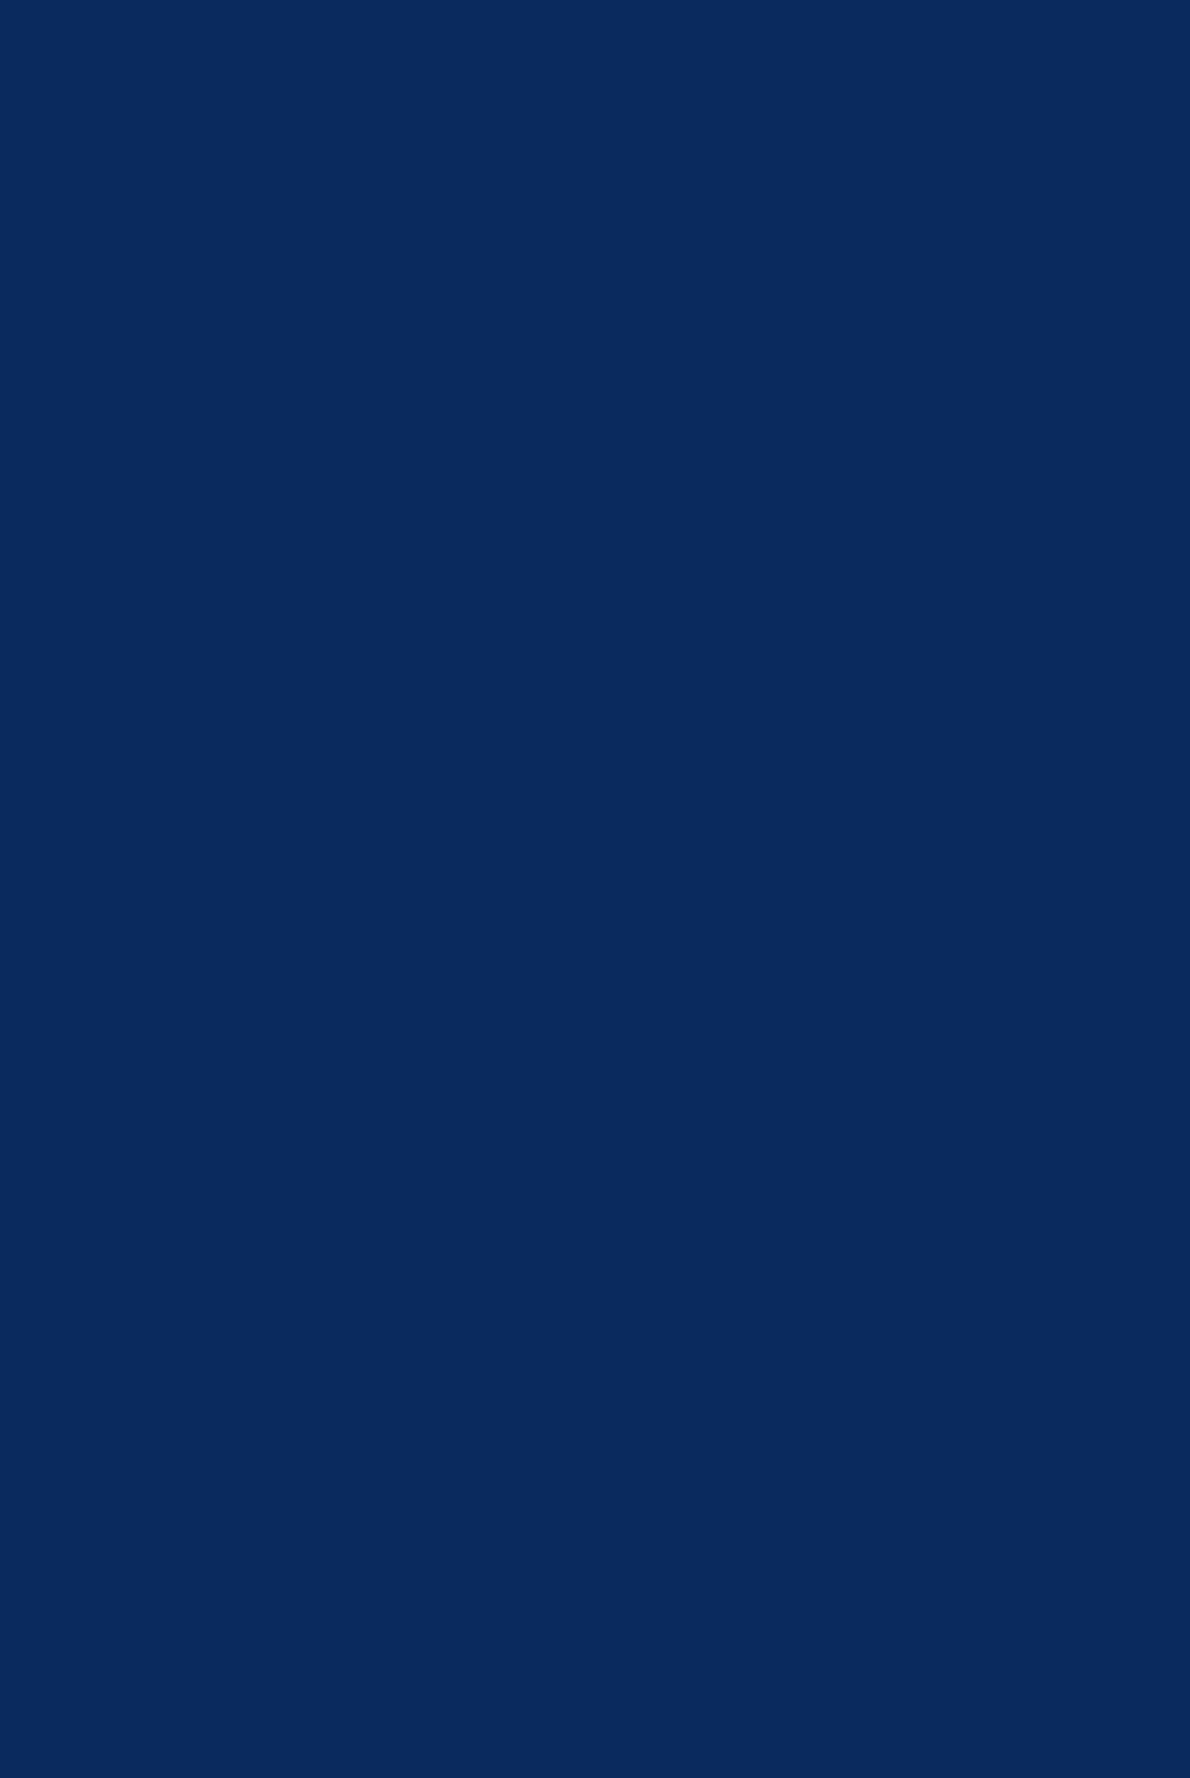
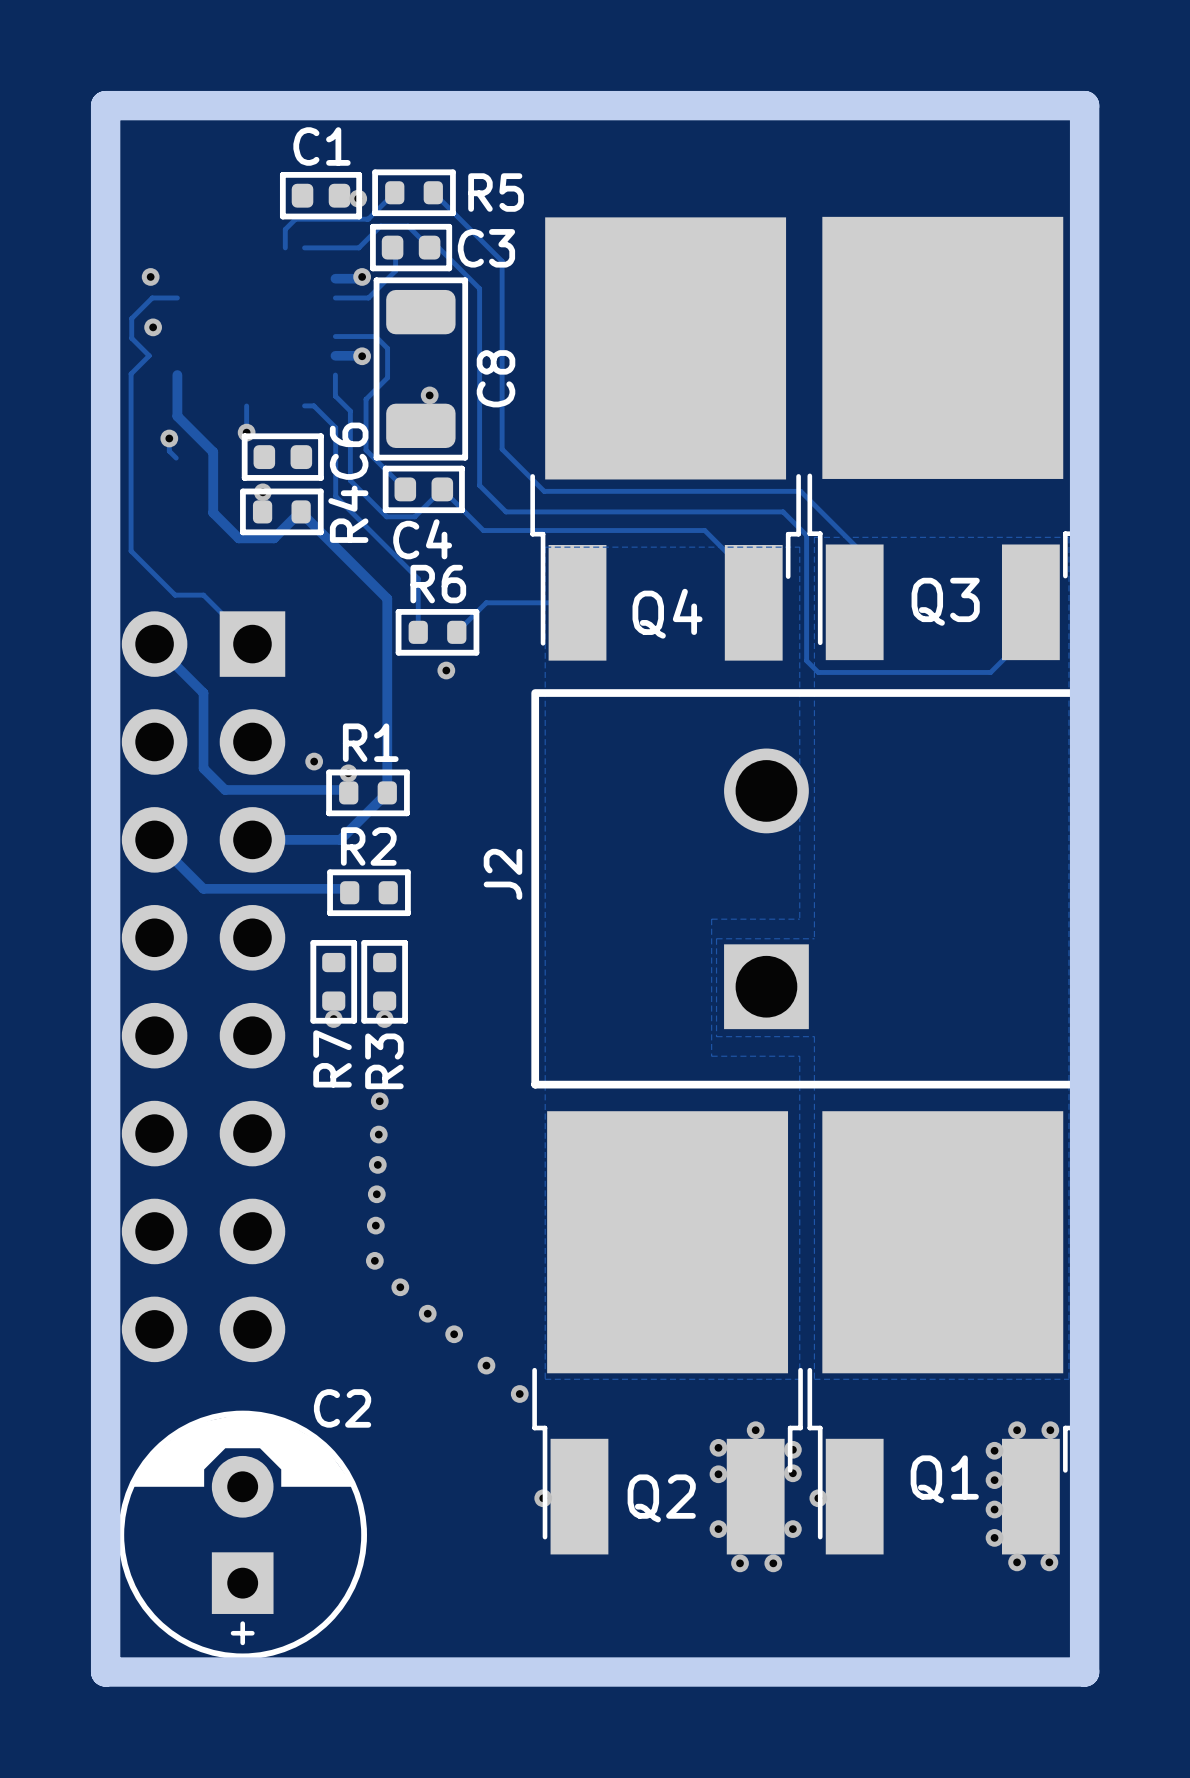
board edge: none -> (105, 105) (1084, 105) (1084, 1672) (105, 1672) (105, 105)
track: none -> (394, 192) (368, 219) (295, 219) (285, 229) (285, 247)
R5: none -> (414, 192)
track: none -> (433, 192) (502, 261) (502, 449) (544, 491) (800, 491) (856, 547) (856, 602)
C1: none -> (321, 195)
via: none -> (358, 198)
track: none -> (304, 247) (358, 247) (380, 226) (408, 226) (429, 247) (438, 247) (479, 288) (479, 485) (506, 511) (783, 511) (806, 535) (806, 660) (818, 672) (990, 672) (1032, 630) (1032, 602)
track: none -> (395, 247) (395, 270) (368, 297) (335, 297)
C3: none -> (411, 247)
via: none -> (150, 276)
track: none -> (362, 276) (360, 278) (335, 278)
via: none -> (362, 276)
track: none -> (177, 297) (152, 297) (131, 318) (131, 338) (149, 355) (131, 373) (131, 551) (175, 595) (203, 595) (252, 644)
via: none -> (153, 327)
track: none -> (335, 336) (375, 336) (387, 348) (387, 377) (366, 399) (366, 450) (405, 489)
track: none -> (335, 355) (361, 355)
via: none -> (362, 356)
C8: none -> (420, 368)
track: none -> (177, 375) (177, 416) (213, 452) (213, 512) (238, 538) (274, 538) (300, 511)
track: none -> (335, 375) (335, 396) (350, 411) (350, 480) (386, 516) (414, 516) (442, 489) (483, 530) (704, 530) (753, 579) (753, 601)
via: none -> (429, 395)
track: none -> (304, 405) (313, 405) (335, 427) (335, 496) (418, 578) (418, 632)
track: none -> (246, 406) (246, 432)
via: none -> (246, 432)
track: none -> (169, 438) (169, 451) (176, 458)
via: none -> (169, 438)
Q3: none -> (942, 438)
Q4: none -> (665, 439)
C6: none -> (282, 457)
C4: none -> (423, 489)
via: none -> (262, 492)
R4: none -> (281, 511)
track: none -> (301, 512) (387, 598) (387, 792) (340, 839) (252, 839)
zone outline: none -> (814, 537) (814, 938) (716, 938) (716, 1036) (814, 1036) (814, 1379) (1068, 1379) (1068, 537) (814, 537)
zone outline: none -> (545, 547) (799, 547) (799, 919) (711, 919) (711, 1056) (799, 1056) (799, 1379) (545, 1379) (545, 547)
track: none -> (577, 602) (486, 602) (456, 632)
R6: none -> (437, 632)
track: none -> (154, 644) (203, 693) (203, 768) (225, 789) (345, 789) (348, 792)
via: none -> (446, 670)
via: none -> (314, 761)
via: none -> (348, 773)
R1: none -> (368, 792)
track: none -> (154, 839) (203, 888) (345, 888) (349, 892)
J2: none -> (805, 888)
R2: none -> (368, 892)
R7: none -> (333, 981)
R3: none -> (384, 981)
part: none -> (203, 986)
via: none -> (333, 1019)
via: none -> (384, 1019)
via: none -> (379, 1101)
via: none -> (378, 1134)
via: none -> (377, 1164)
via: none -> (376, 1194)
via: none -> (375, 1225)
via: none -> (374, 1260)
via: none -> (400, 1287)
via: none -> (427, 1313)
Q2: none -> (667, 1332)
Q1: none -> (942, 1332)
via: none -> (454, 1334)
via: none -> (486, 1365)
via: none -> (519, 1393)
via: none -> (755, 1430)
via: none -> (1017, 1430)
via: none -> (1050, 1430)
via: none -> (718, 1447)
via: none -> (792, 1449)
via: none -> (994, 1450)
via: none -> (792, 1473)
via: none -> (718, 1474)
via: none -> (994, 1480)
via: none -> (543, 1498)
via: none -> (818, 1498)
via: none -> (994, 1509)
via: none -> (718, 1529)
via: none -> (792, 1529)
C2: none -> (242, 1534)
via: none -> (994, 1537)
via: none -> (1017, 1562)
via: none -> (1049, 1562)
via: none -> (740, 1563)
via: none -> (773, 1563)

